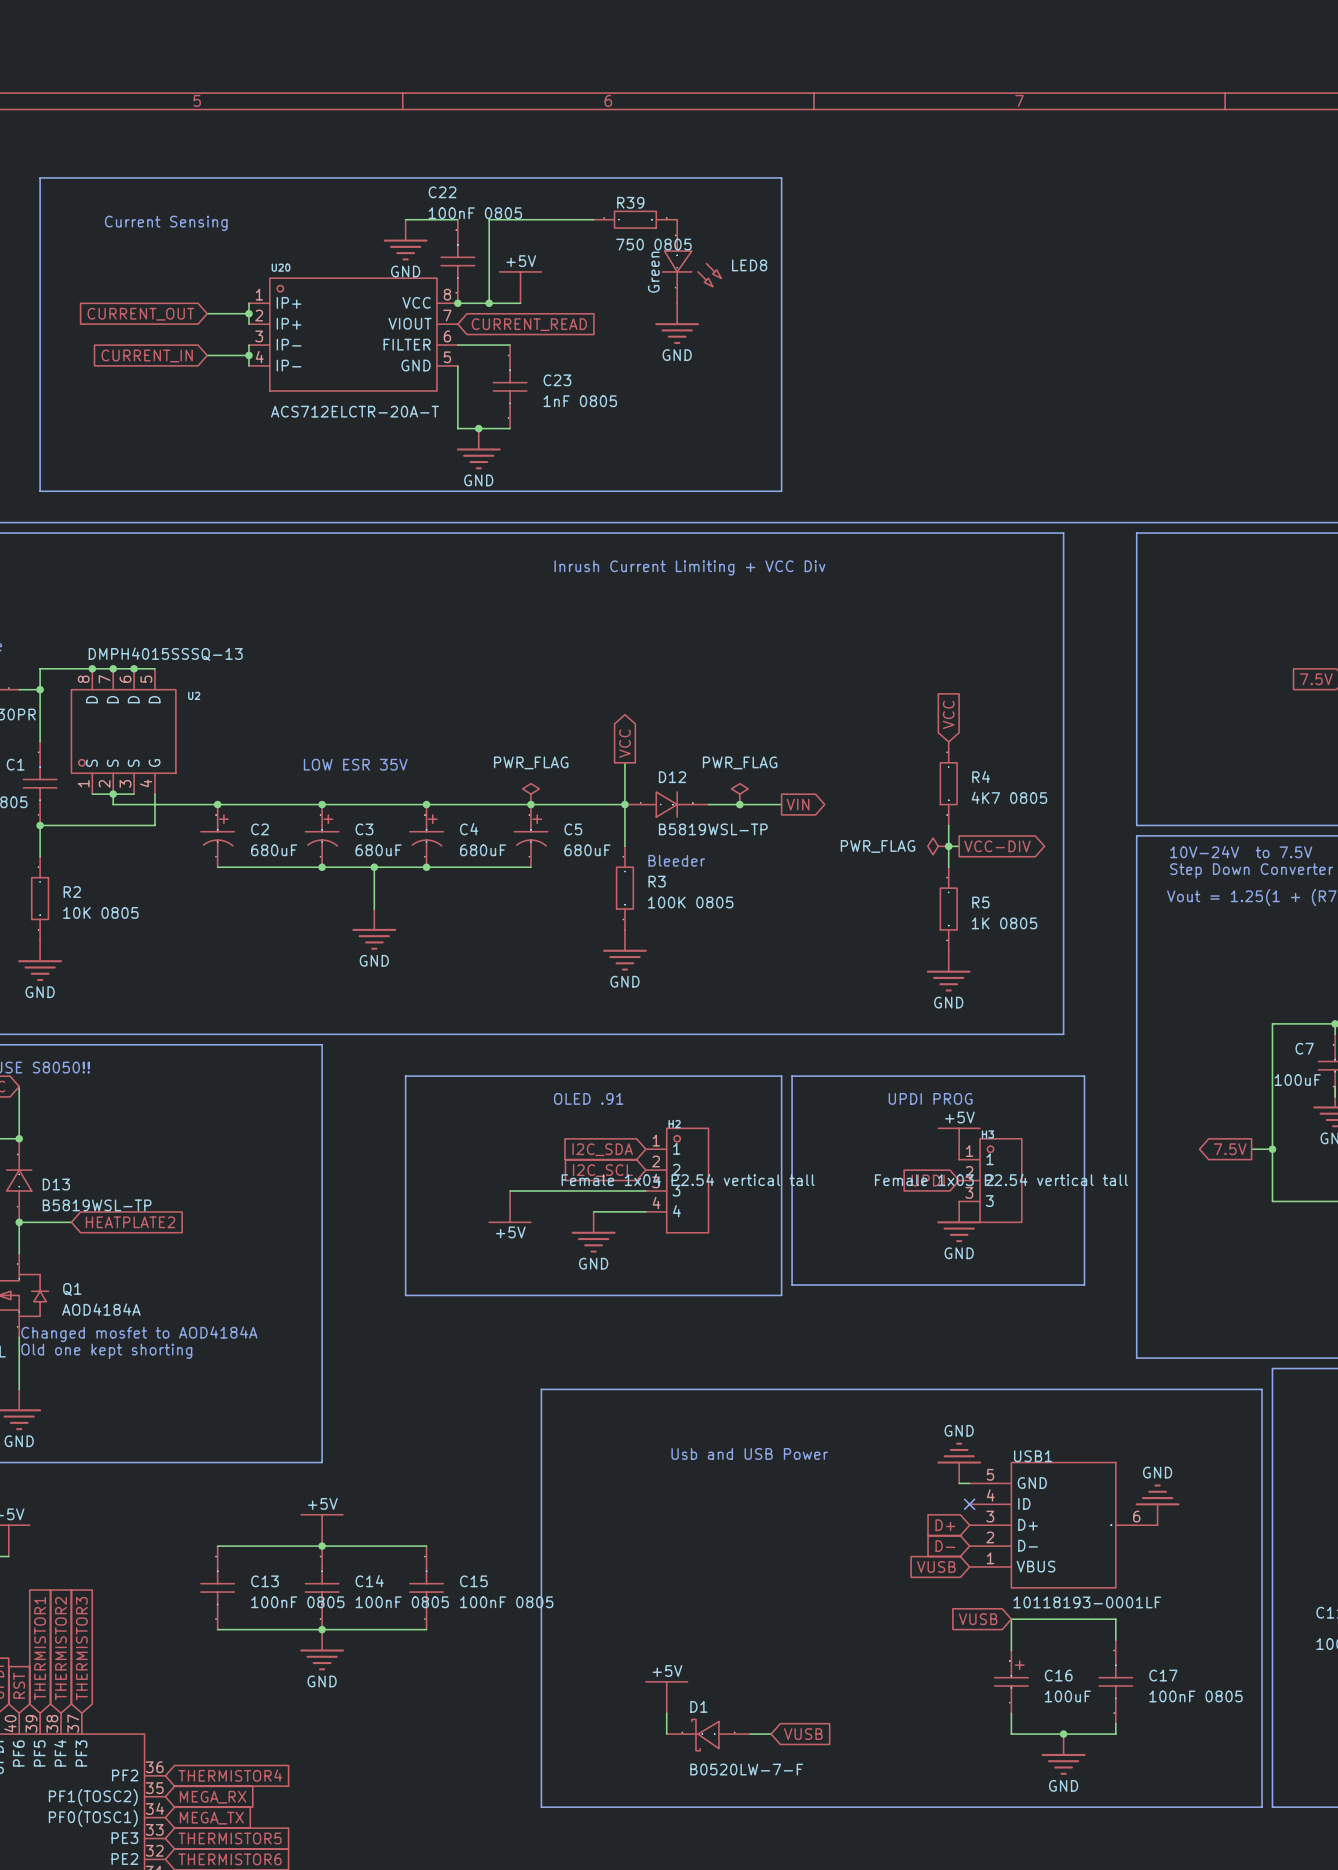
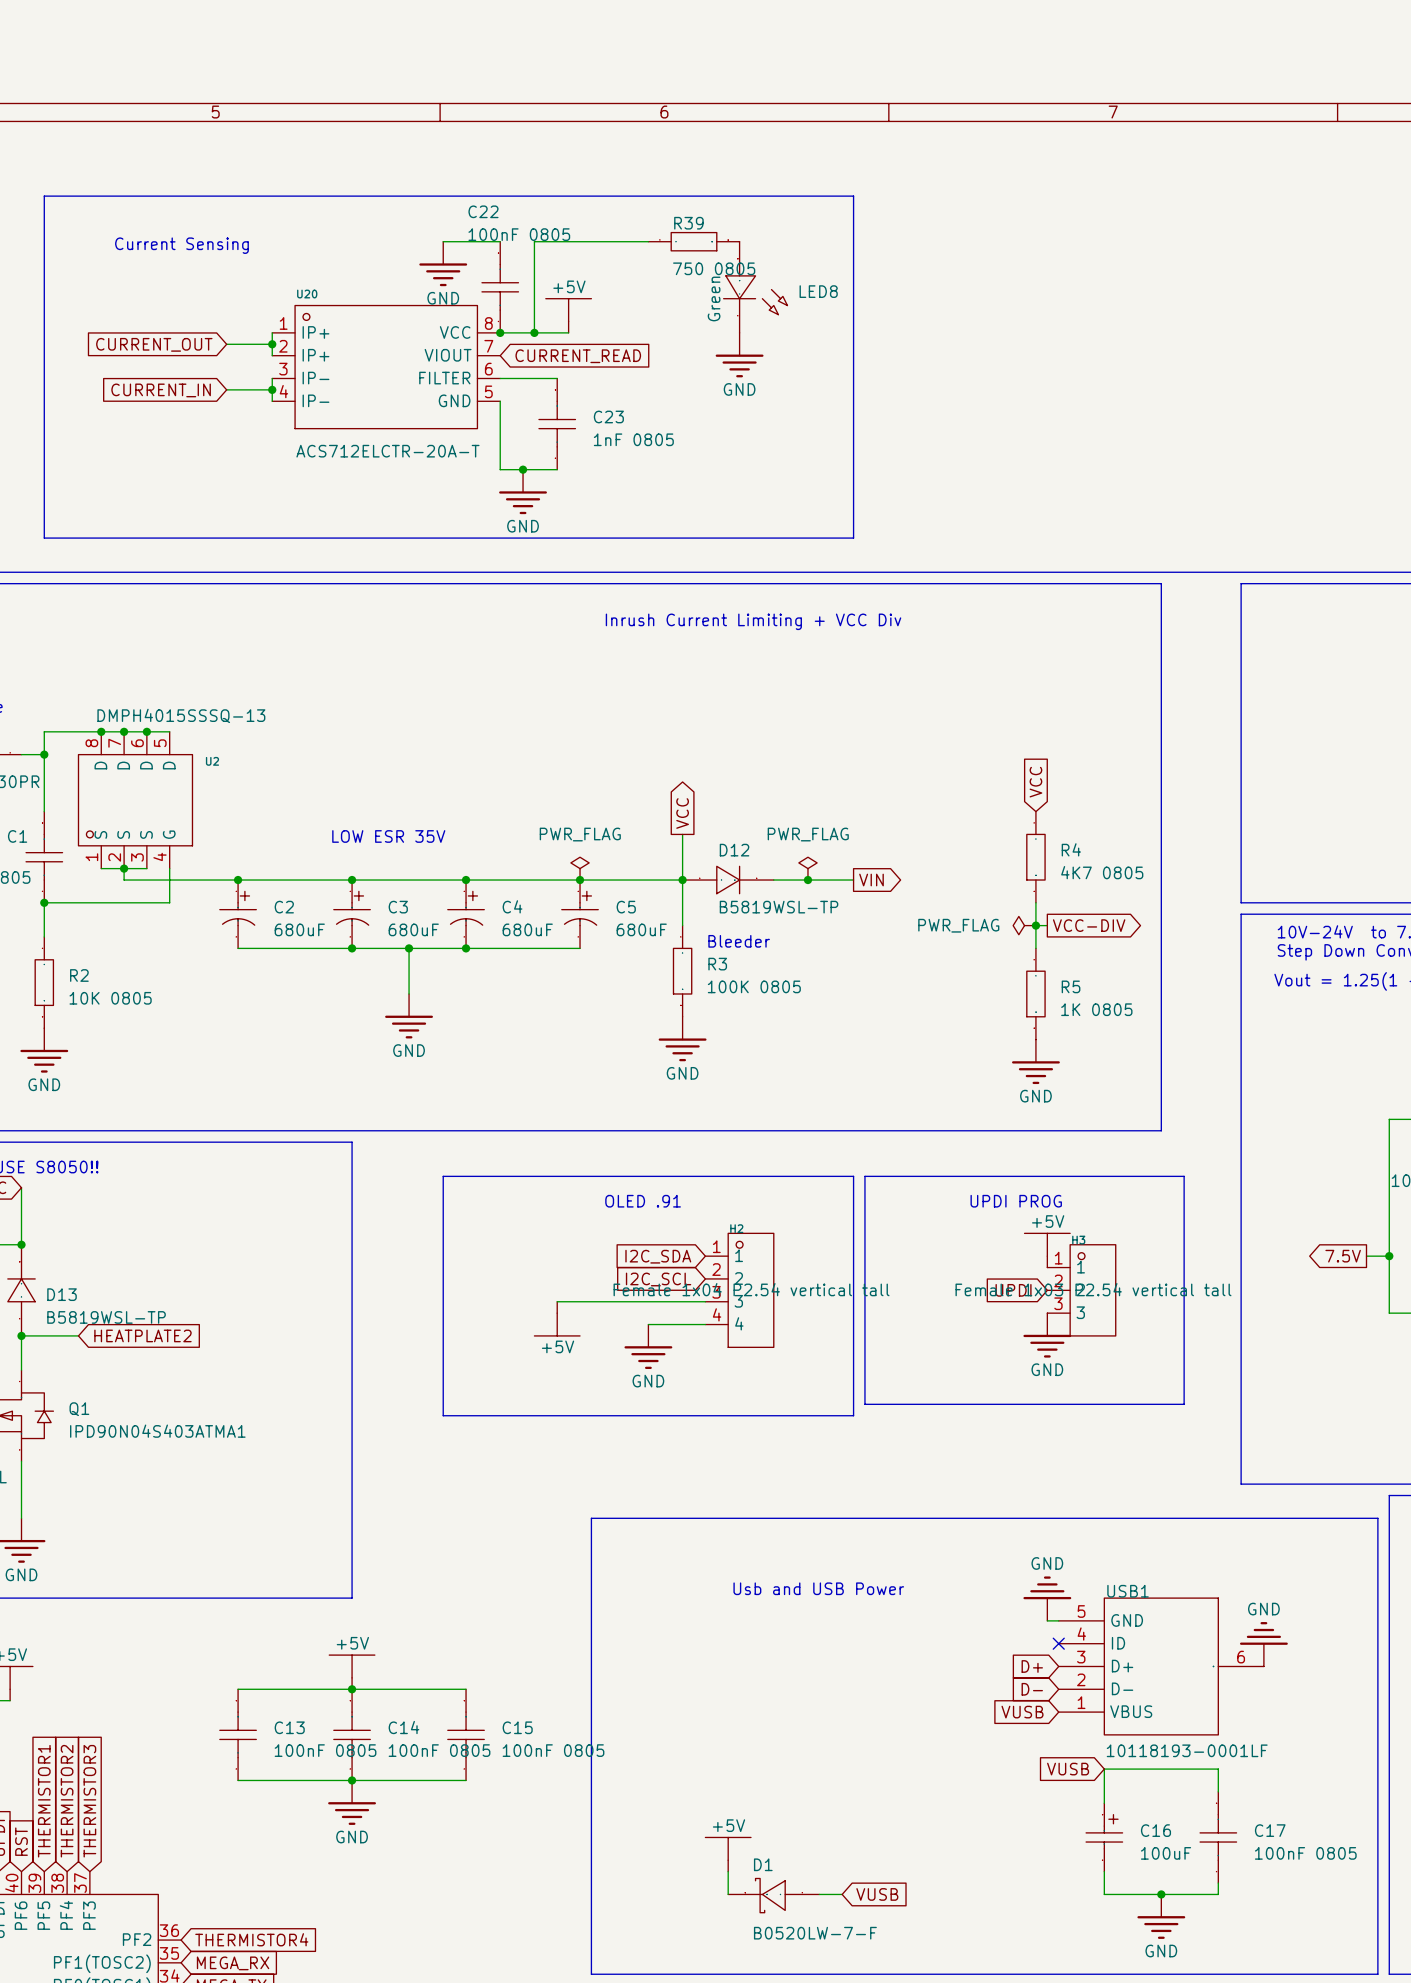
Q1 value: AOD4184A (101, 1309) -> IPD90N04S403ATMA1 (157, 1431)
text: Changed mosfet to AOD4184A (139, 1334) -> none
text: Old one kept shorting (106, 1351) -> none

